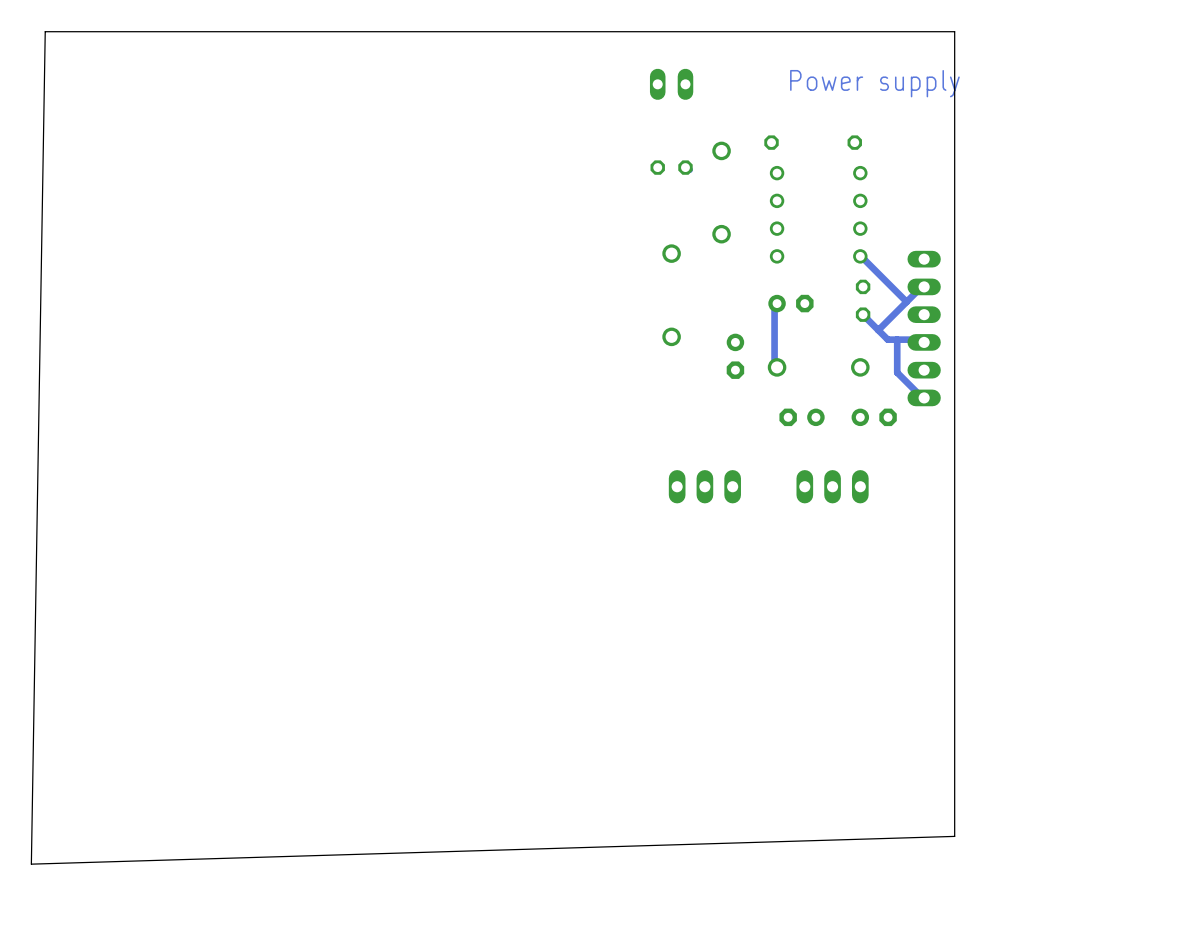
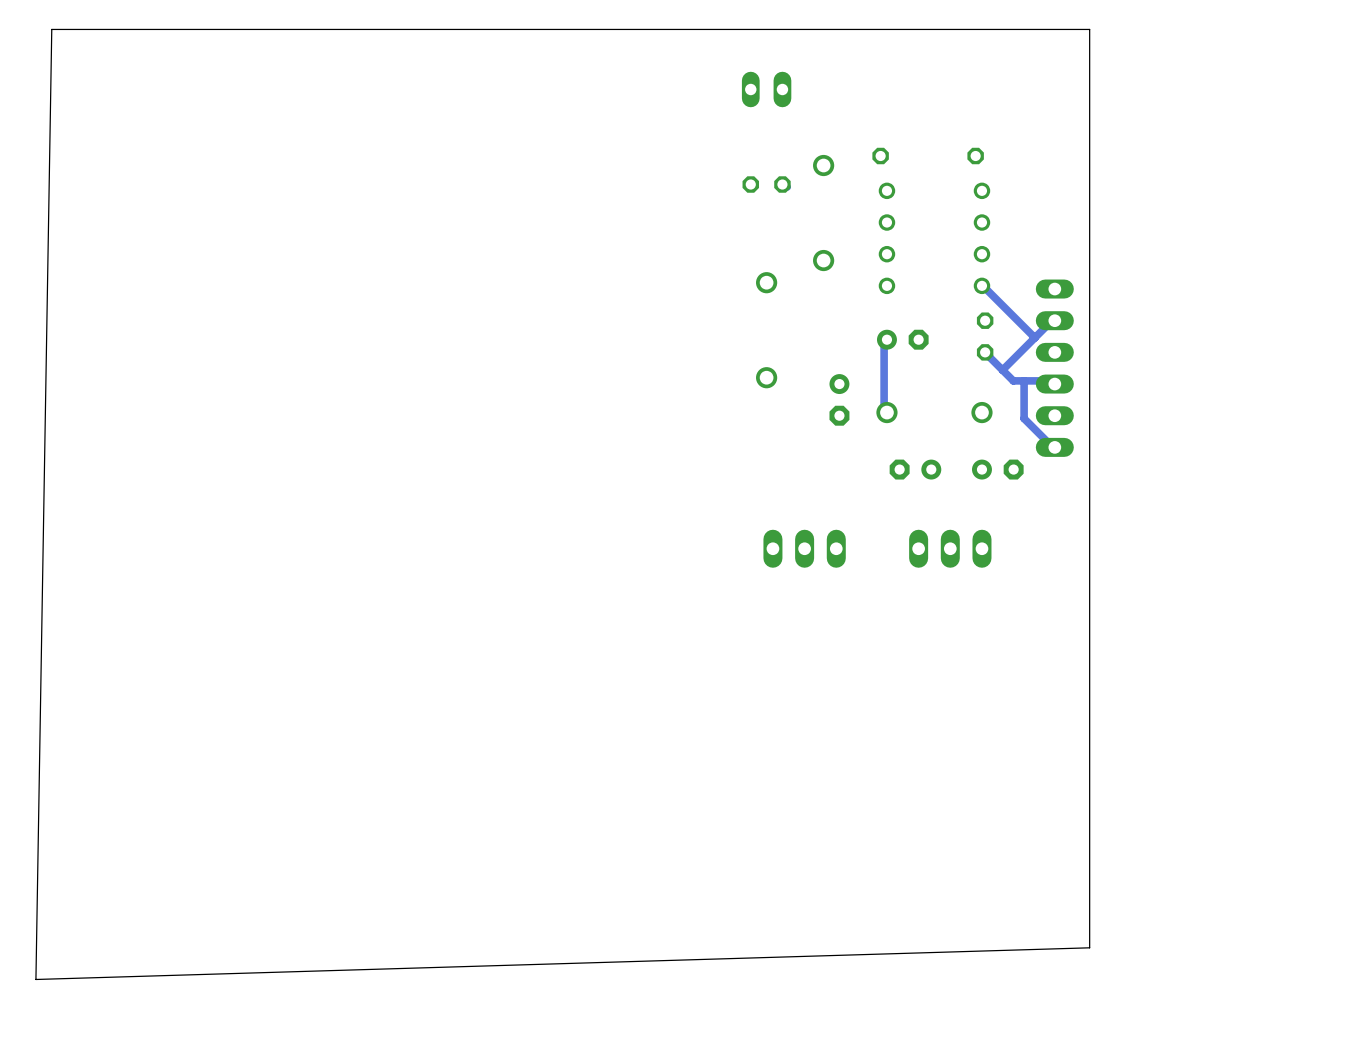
text: Power supply (874, 83) -> none

